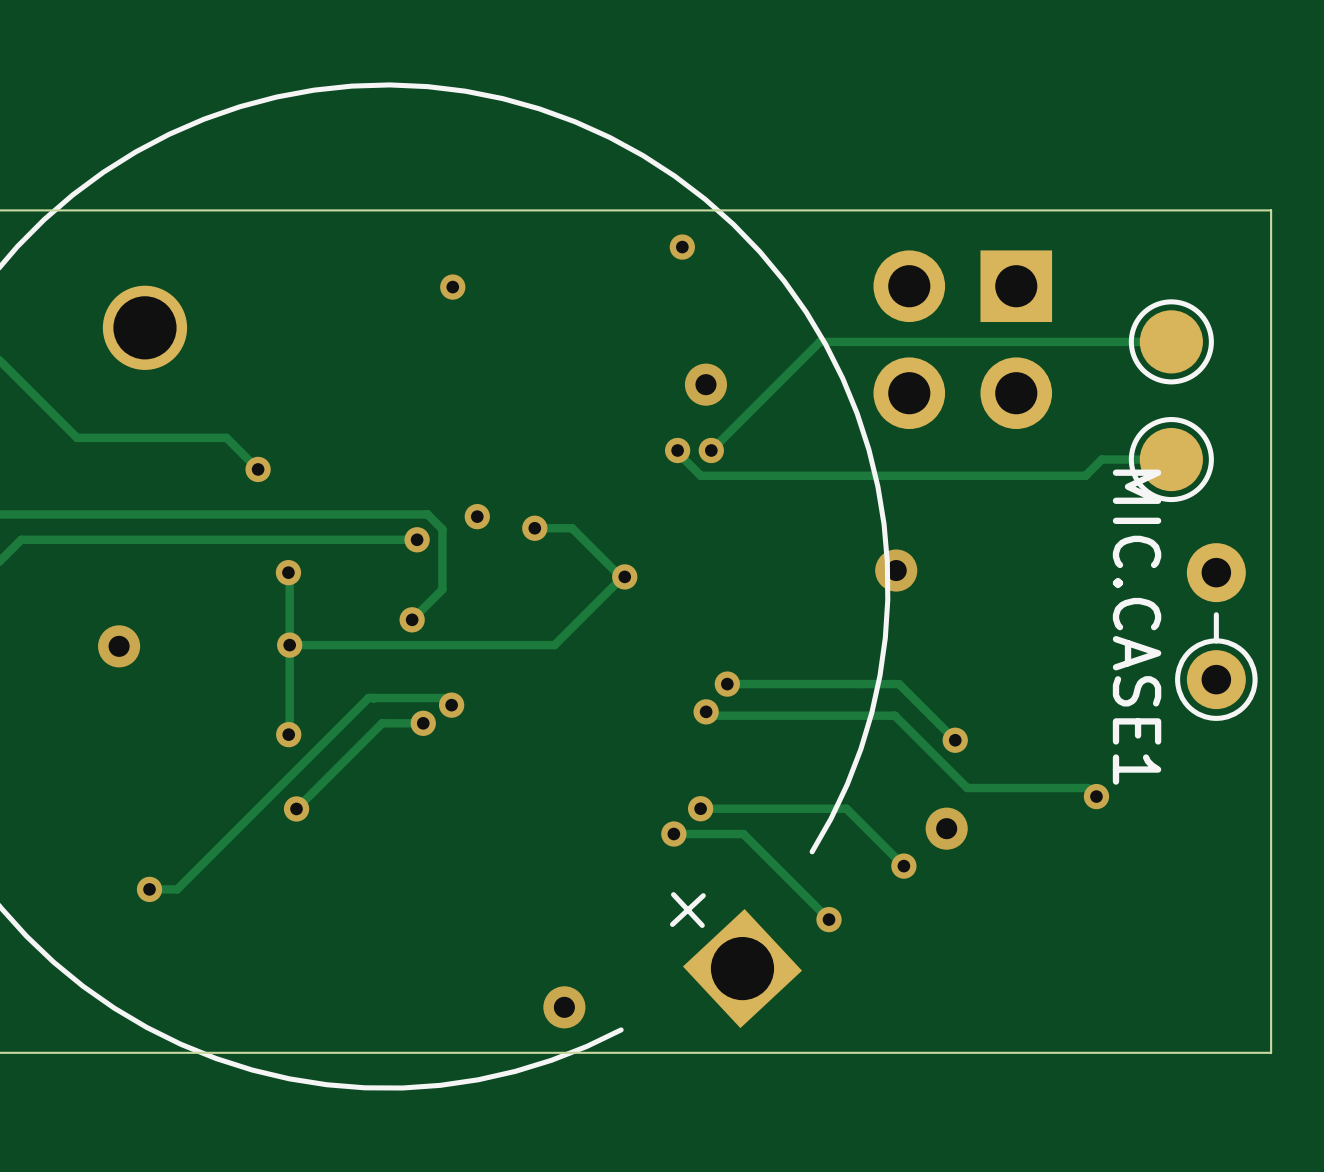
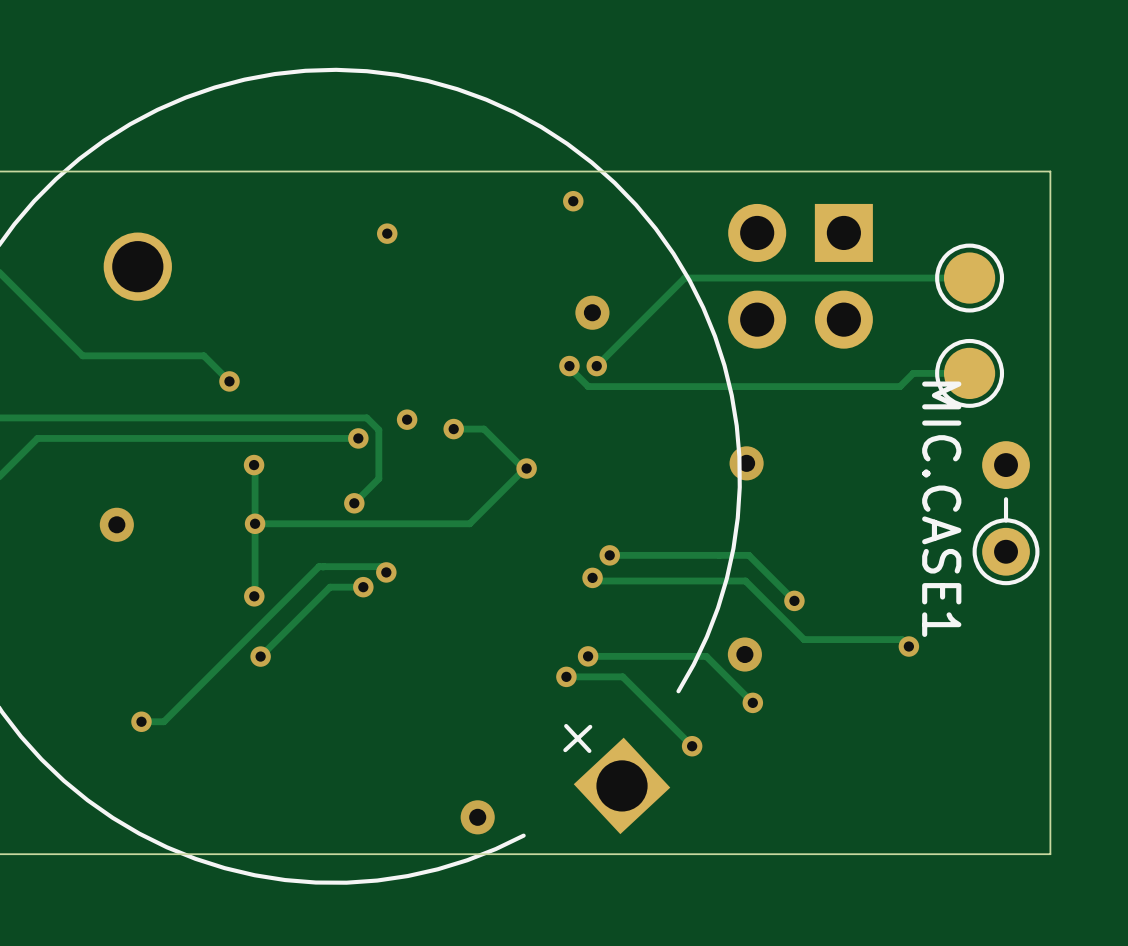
via position: (946, 828) -> (744, 654)

